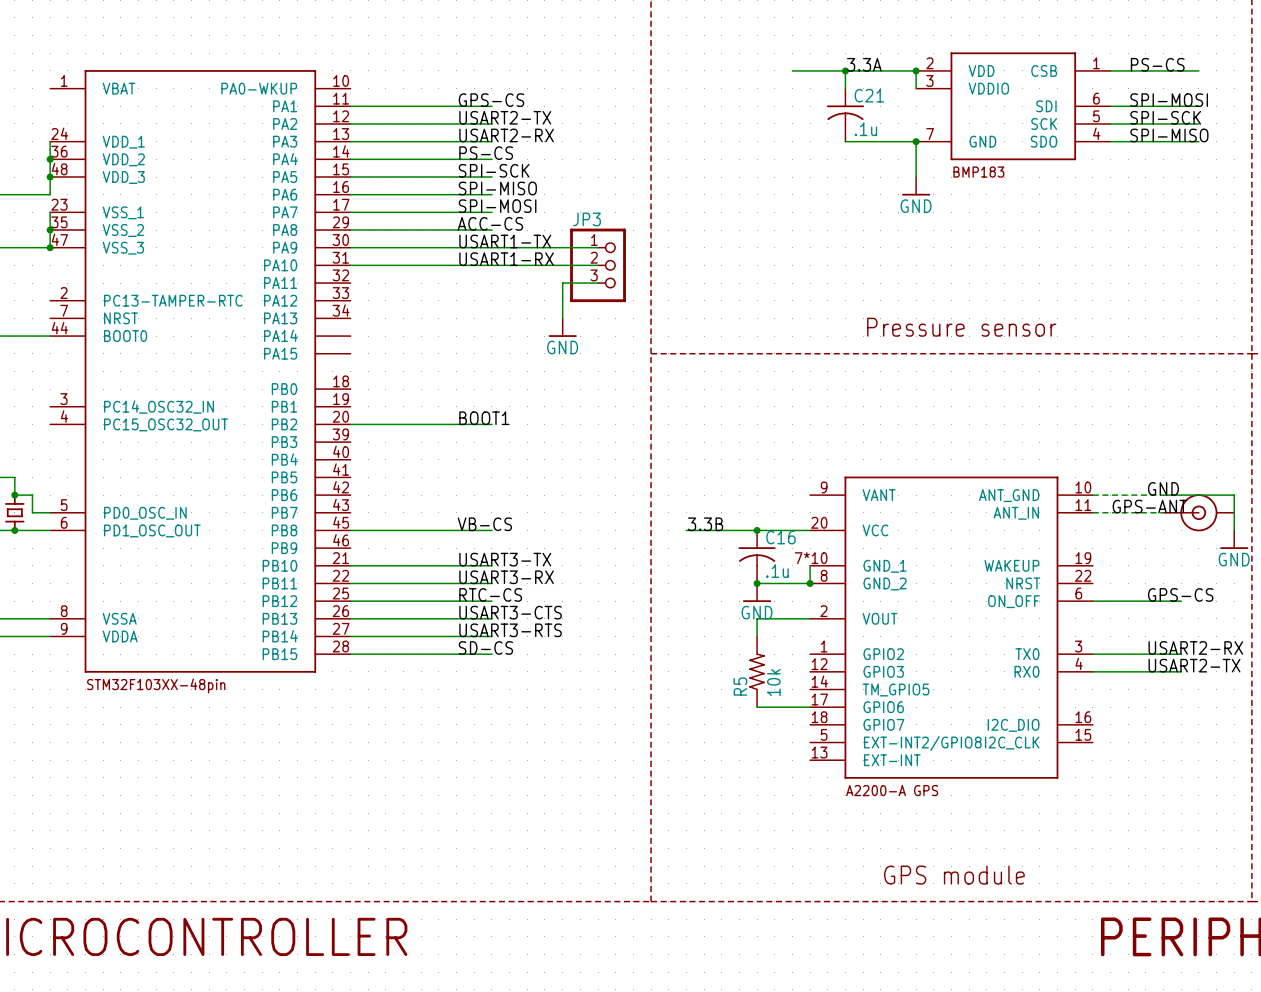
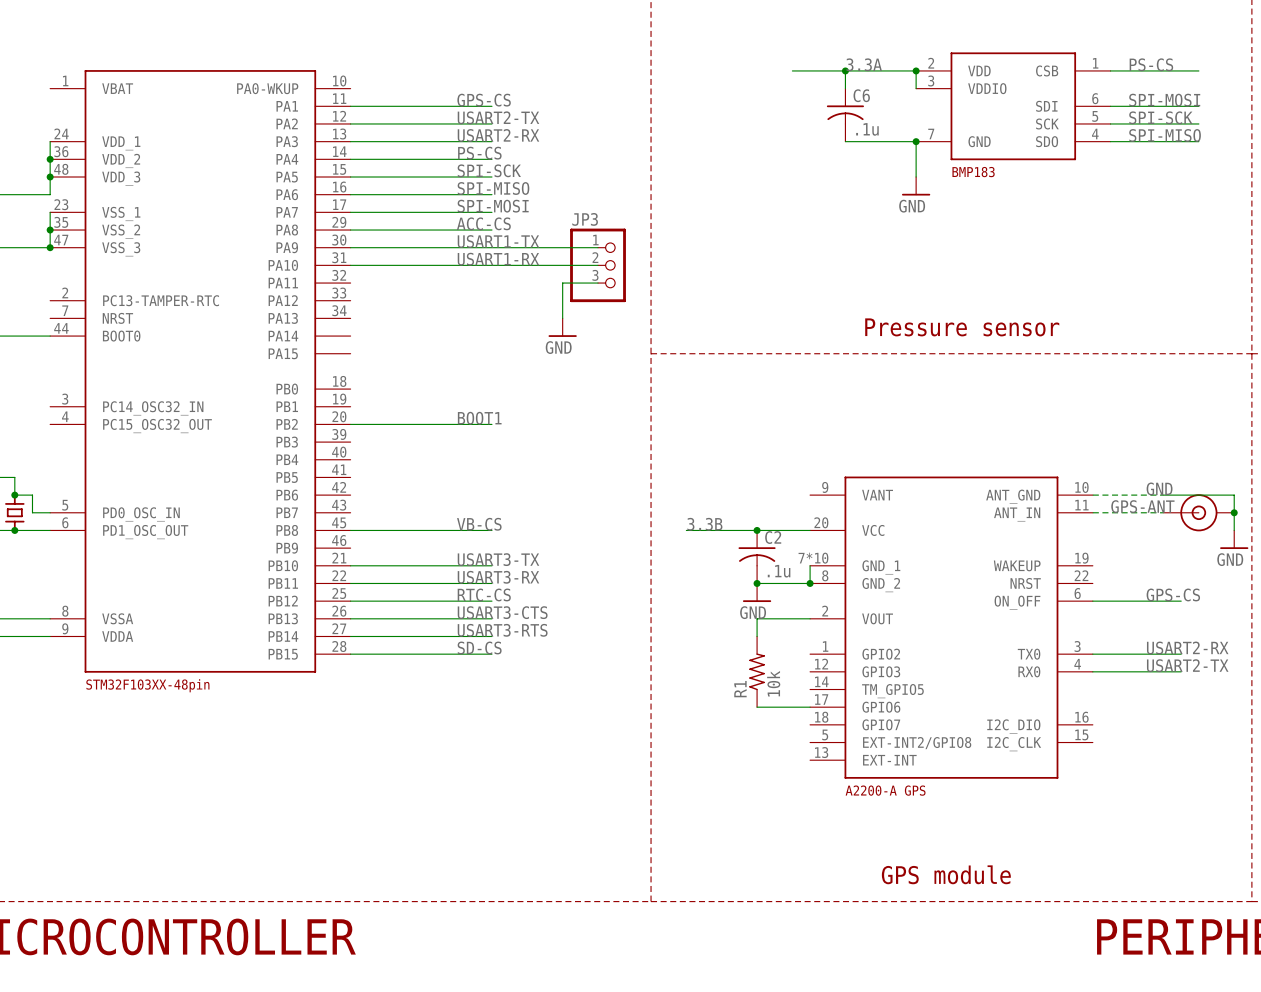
C21 name: C21 (869, 95) -> C6 (861, 95)
junction: none -> (1234, 512)
C16 name: C16 (780, 537) -> C2 (773, 537)
R5 name: R5 (740, 686) -> R1 (740, 689)

